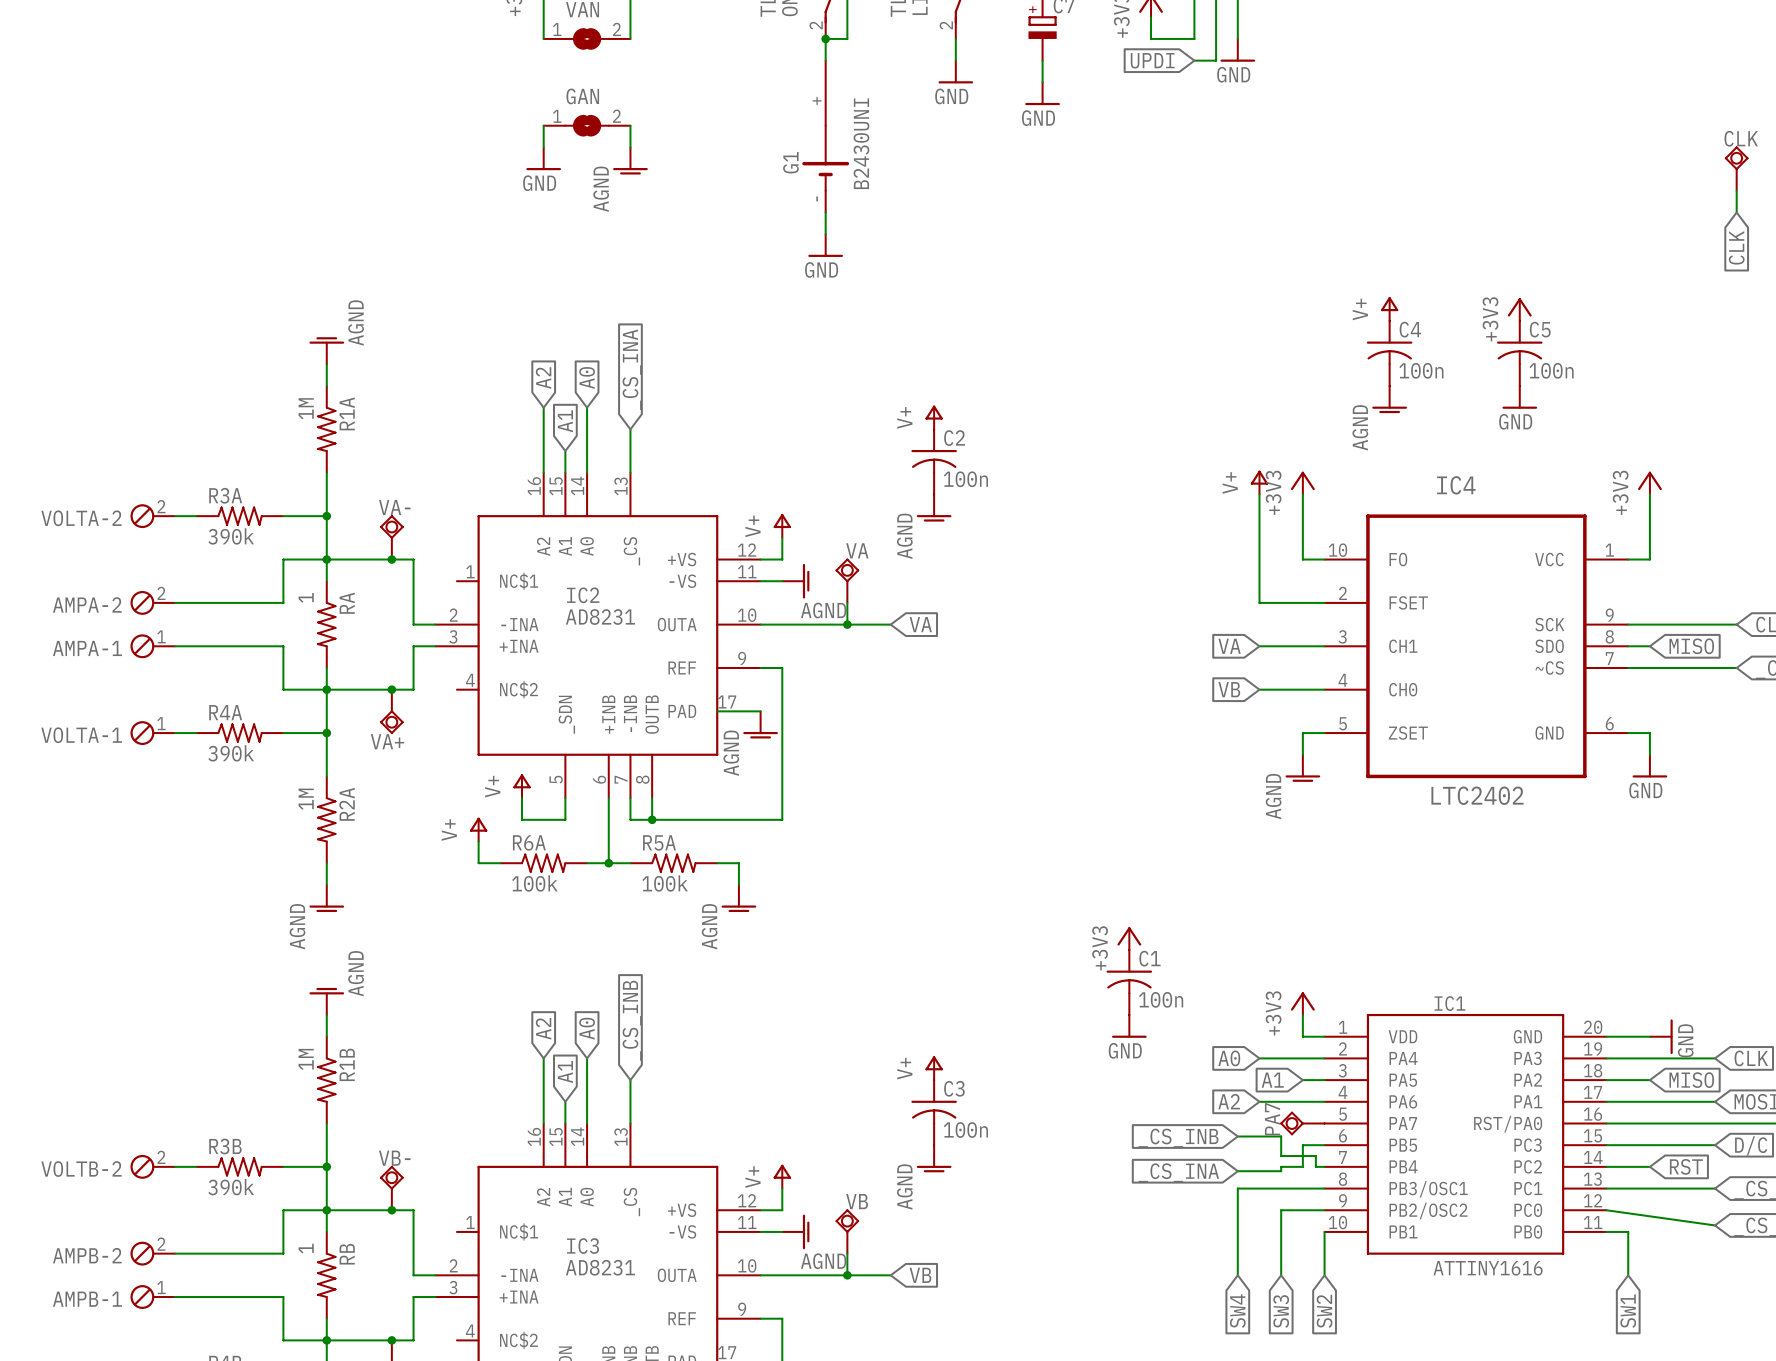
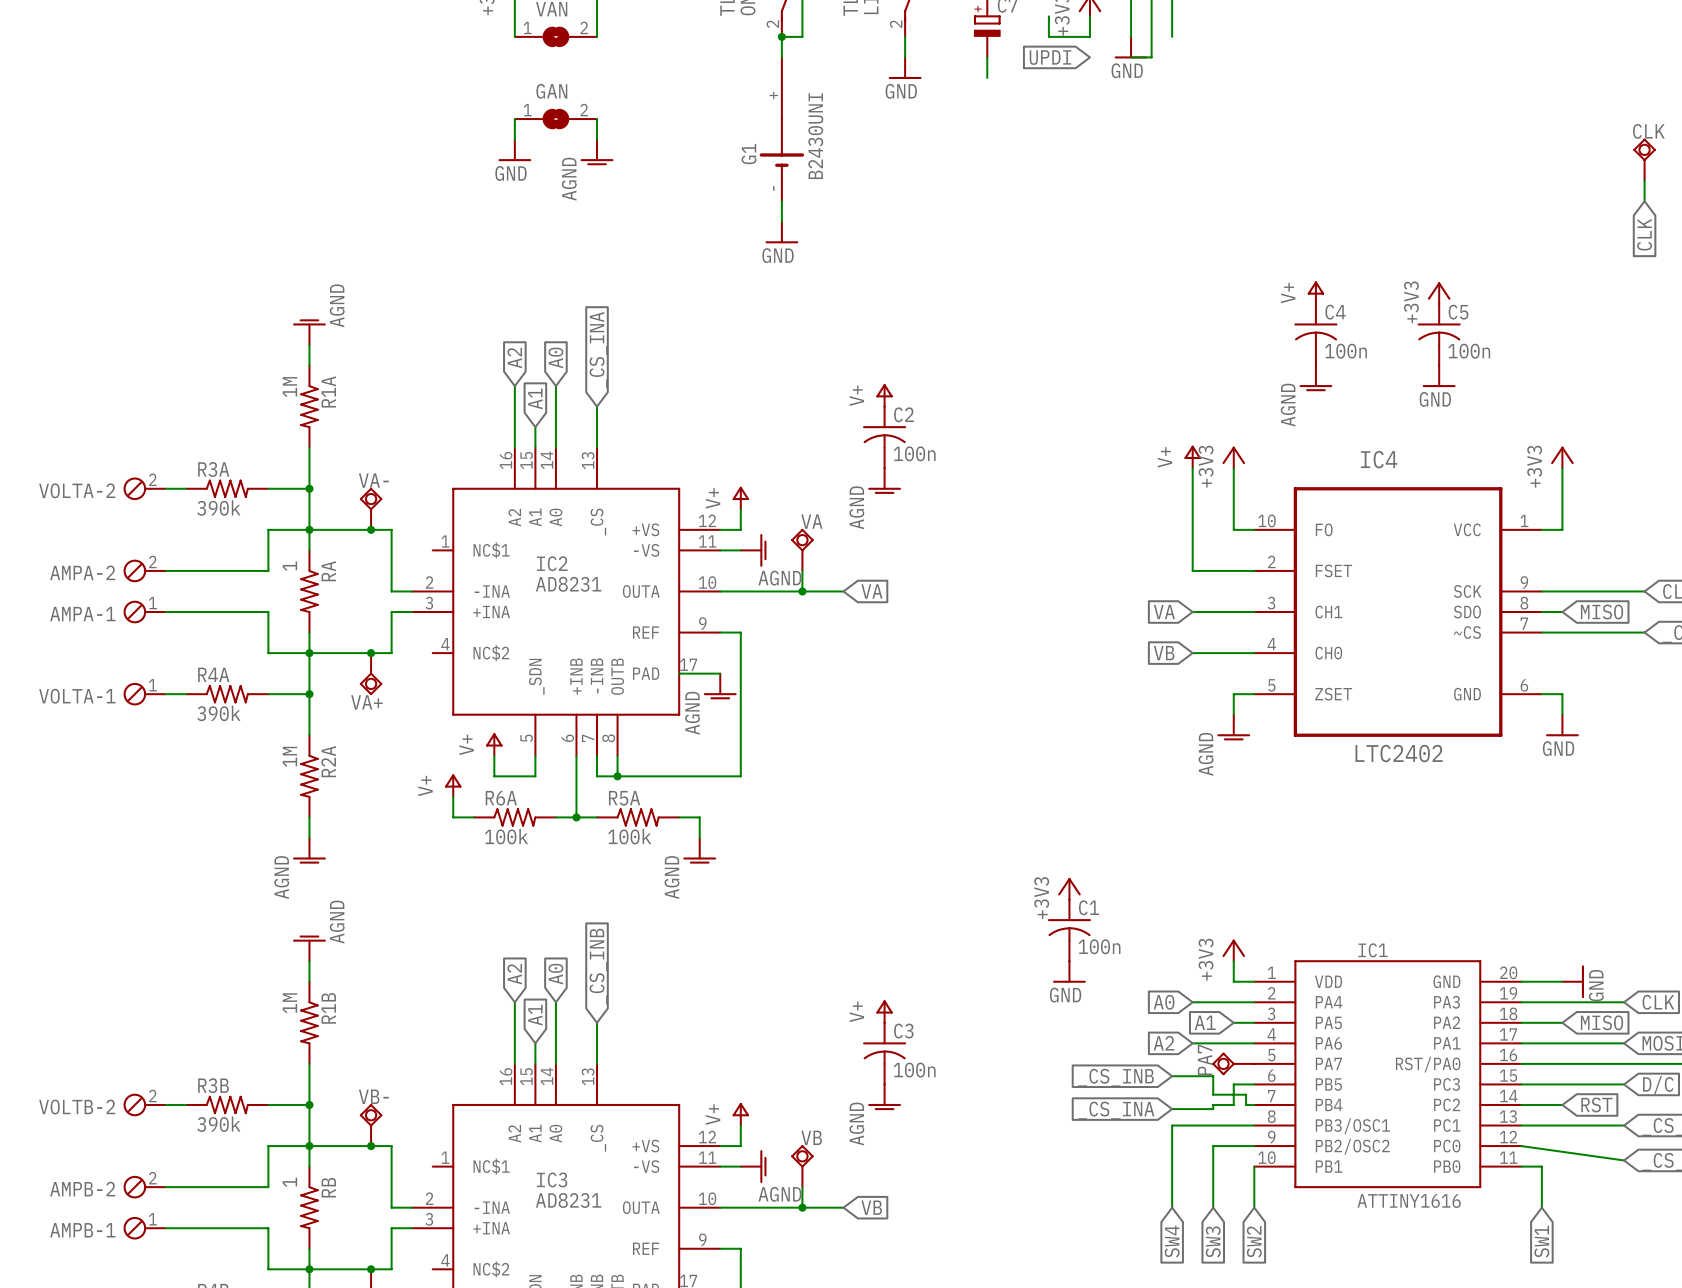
wire: (1151, 38) (1194, 38) -> (1089, 36) (1048, 36) (1048, 16)
power symbol position: GND (1237, 50) -> GND (1131, 47)
global label position: UPDI (1152, 60) -> UPDI (1050, 57)
power symbol: GND (1042, 93) -> none

